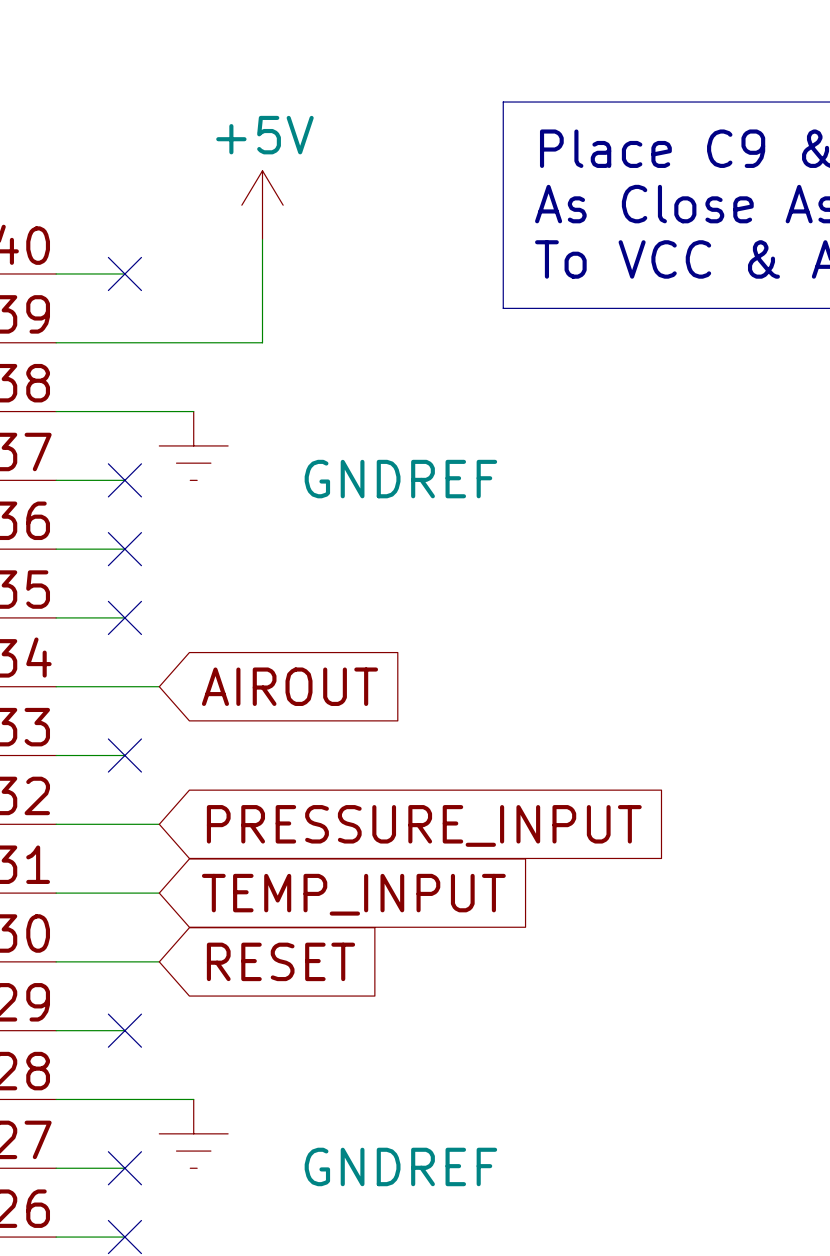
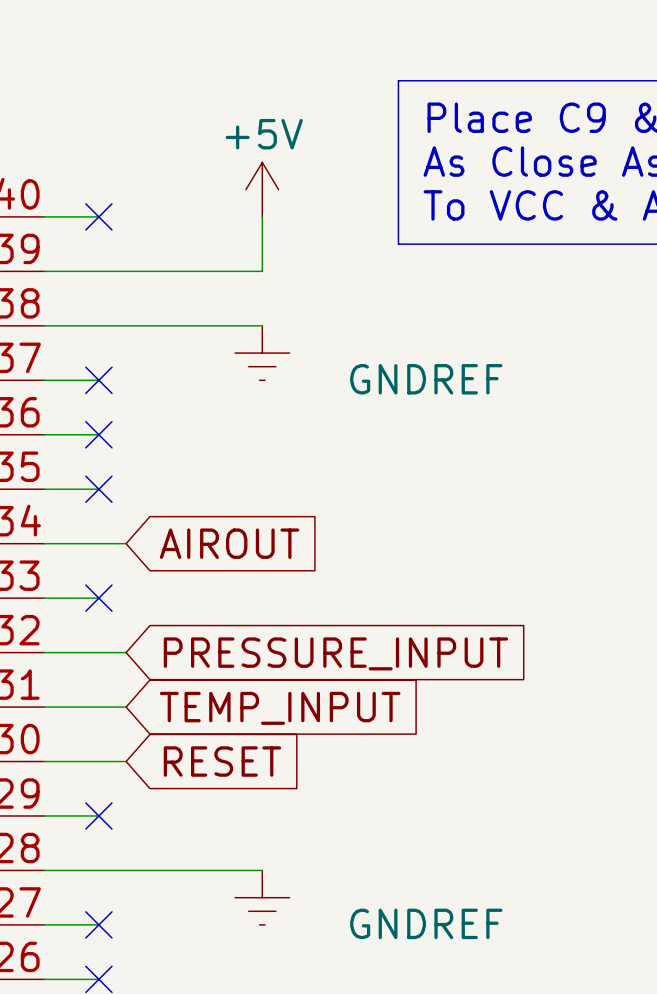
power symbol position: +5V (262, 205) -> +5V (262, 189)
wire: (262, 239) (262, 342) -> (262, 216) (262, 271) (207, 271)
wire: none -> (153, 325) (262, 325)
power symbol position: GNDREF (193, 445) -> GNDREF (262, 353)
wire: none -> (153, 870) (262, 870)
power symbol position: GNDREF (193, 1133) -> GNDREF (262, 897)

